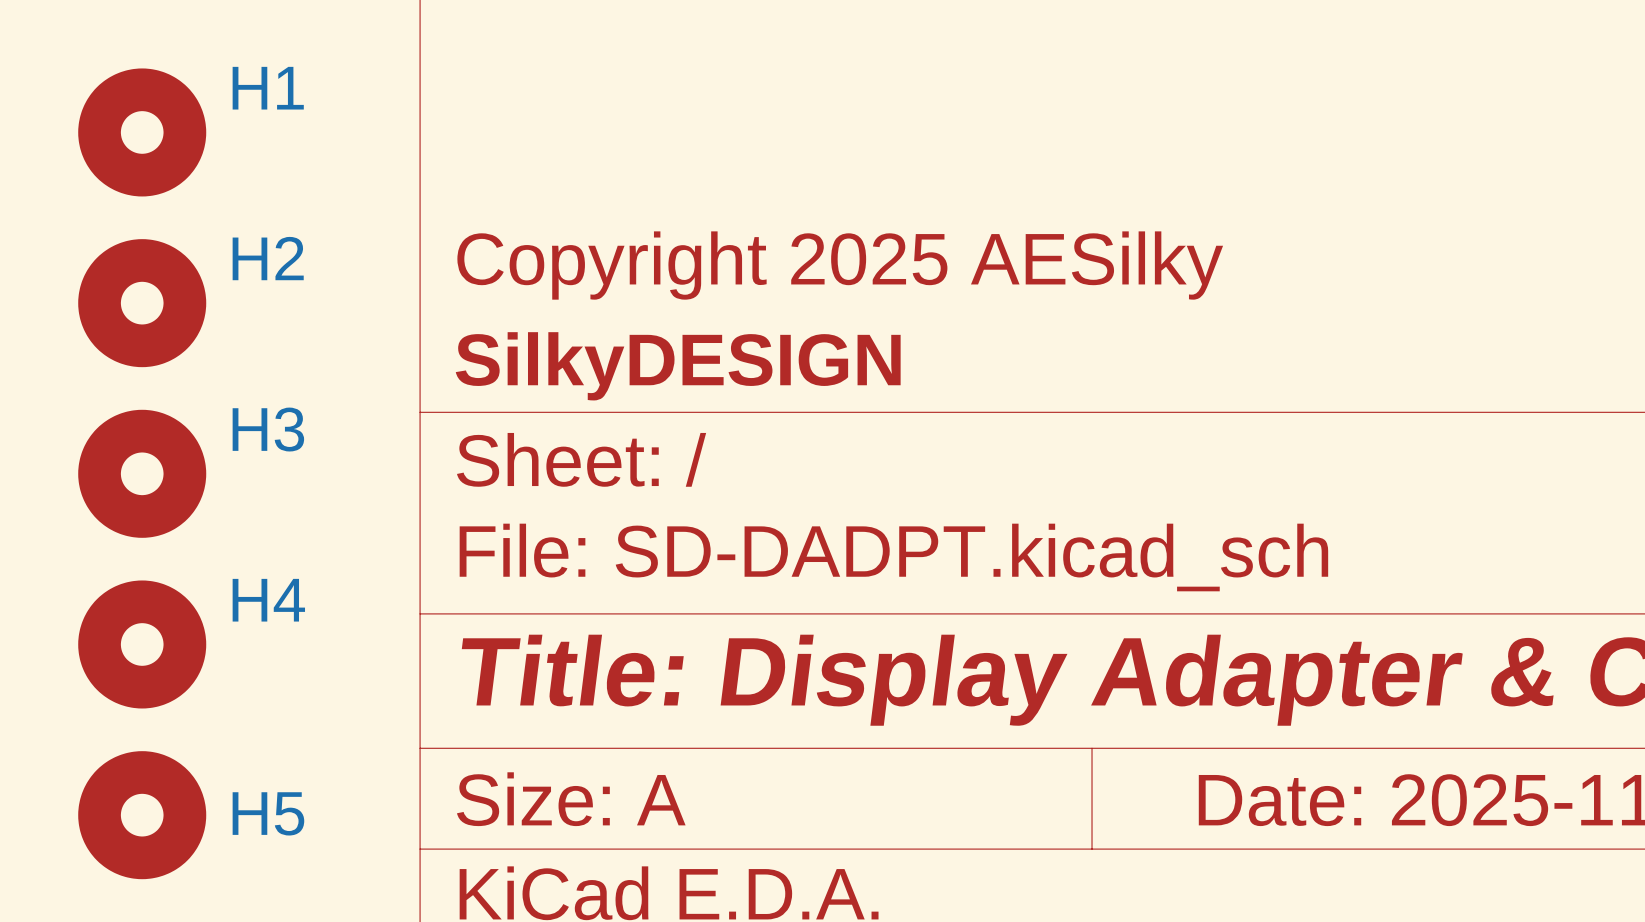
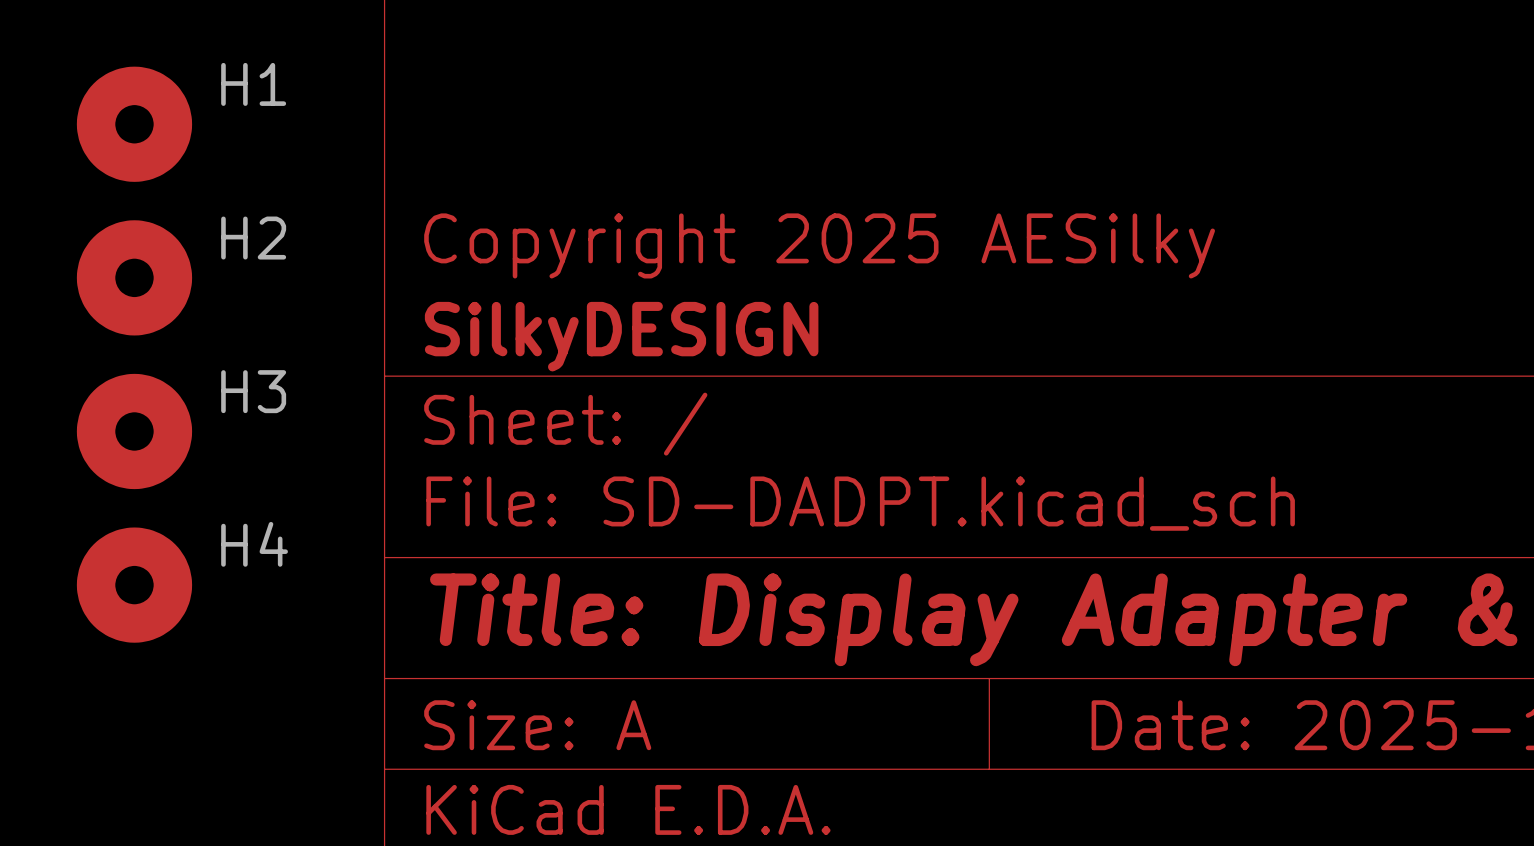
H5: (142, 815) -> none

